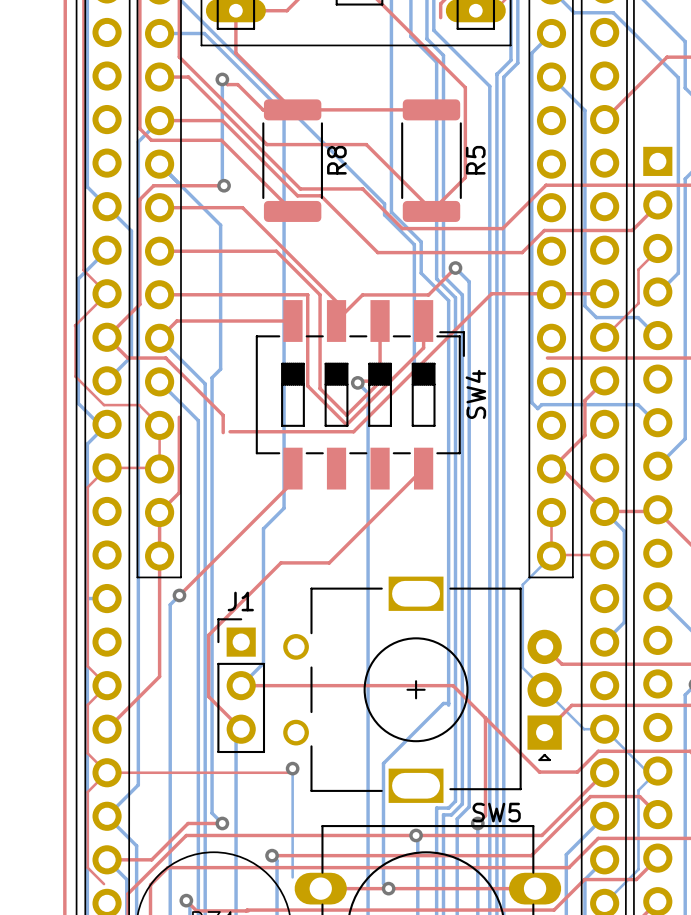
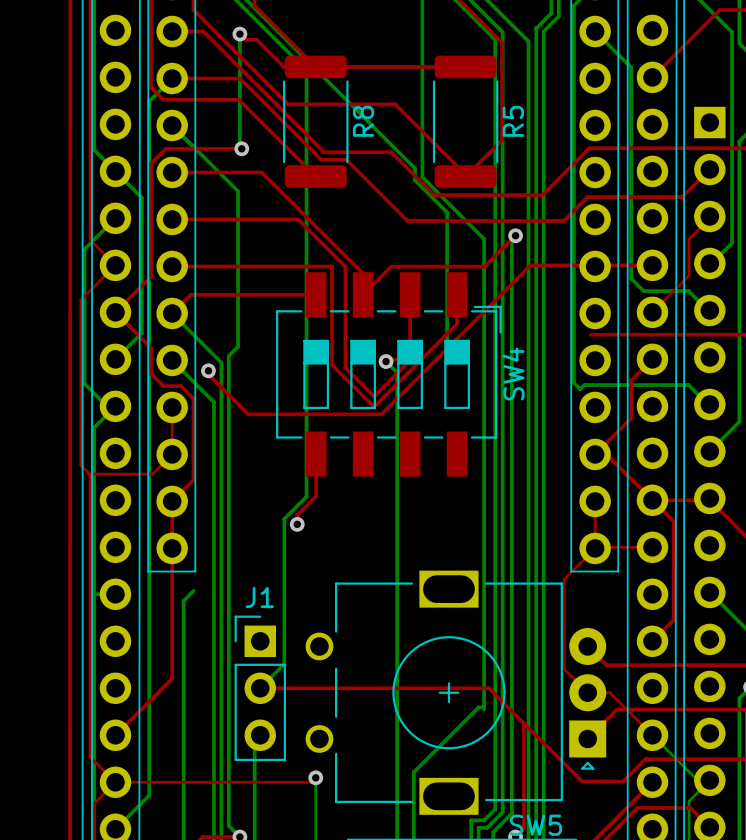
bottom track: (443, 55) (443, 276) (462, 294) (462, 804) -> (478, 8) (502, 32) (502, 812) (498, 816)
bottom track: (436, 62) (436, 278) (455, 297) (455, 801) -> (471, 15) (495, 39) (495, 809) (491, 812)
bottom track: (421, 241) (421, 273) (448, 300) -> (454, 209) (484, 238) (484, 272)
top track: (455, 268) (428, 294) -> (515, 235) (484, 266) (462, 266)
bottom track: (455, 268) (469, 281) (469, 806) -> (515, 235) (511, 239) (511, 813) (506, 819)
via position: (455, 268) -> (515, 235)
top track: none -> (80, 300) (80, 465) (90, 474)
top track: (75, 325) (75, 376) (104, 405) (139, 405) (159, 425) -> none
top track: (127, 358) (165, 358) (223, 415) (223, 432) -> (137, 334) (150, 347) (150, 373) (163, 386) (181, 386) (193, 398)
top track: none -> (208, 370) (208, 374) (248, 414)
via: none -> (208, 370)
top track: (159, 468) (107, 467) (87, 487) (87, 666) (107, 685) (87, 704) (87, 753) -> (90, 474) (90, 756) (94, 761)
top track: none -> (172, 454) (152, 474) (90, 474)
top track: (423, 468) (329, 562) (280, 562) (208, 635) (208, 696) (241, 729) -> none
top track: (292, 481) (179, 595) -> (316, 468) (316, 496) (297, 515) (297, 524)
top track: none -> (652, 500) (673, 521) (673, 620) (652, 641)
bottom track: (604, 511) (624, 531) (624, 622) (604, 642) -> none
via: none -> (297, 524)
top track: none -> (595, 548) (564, 579) (564, 669) (587, 692) (609, 692) (652, 735)
bottom track: (551, 556) (522, 584) (522, 667) (584, 729) (604, 729) -> none
via: (179, 595) -> none

